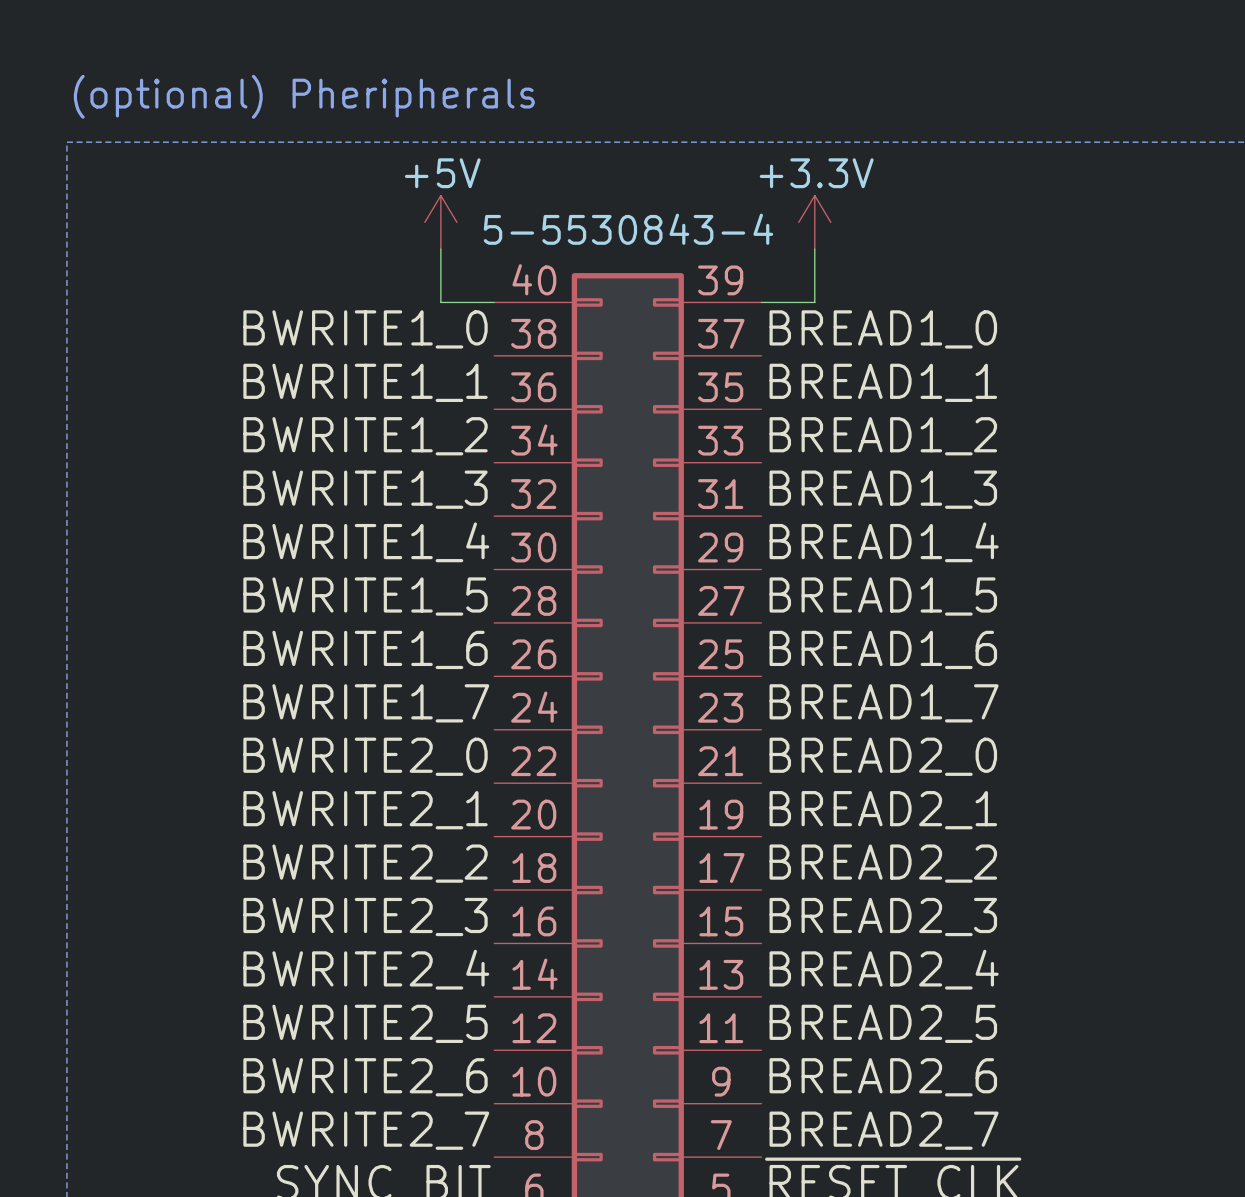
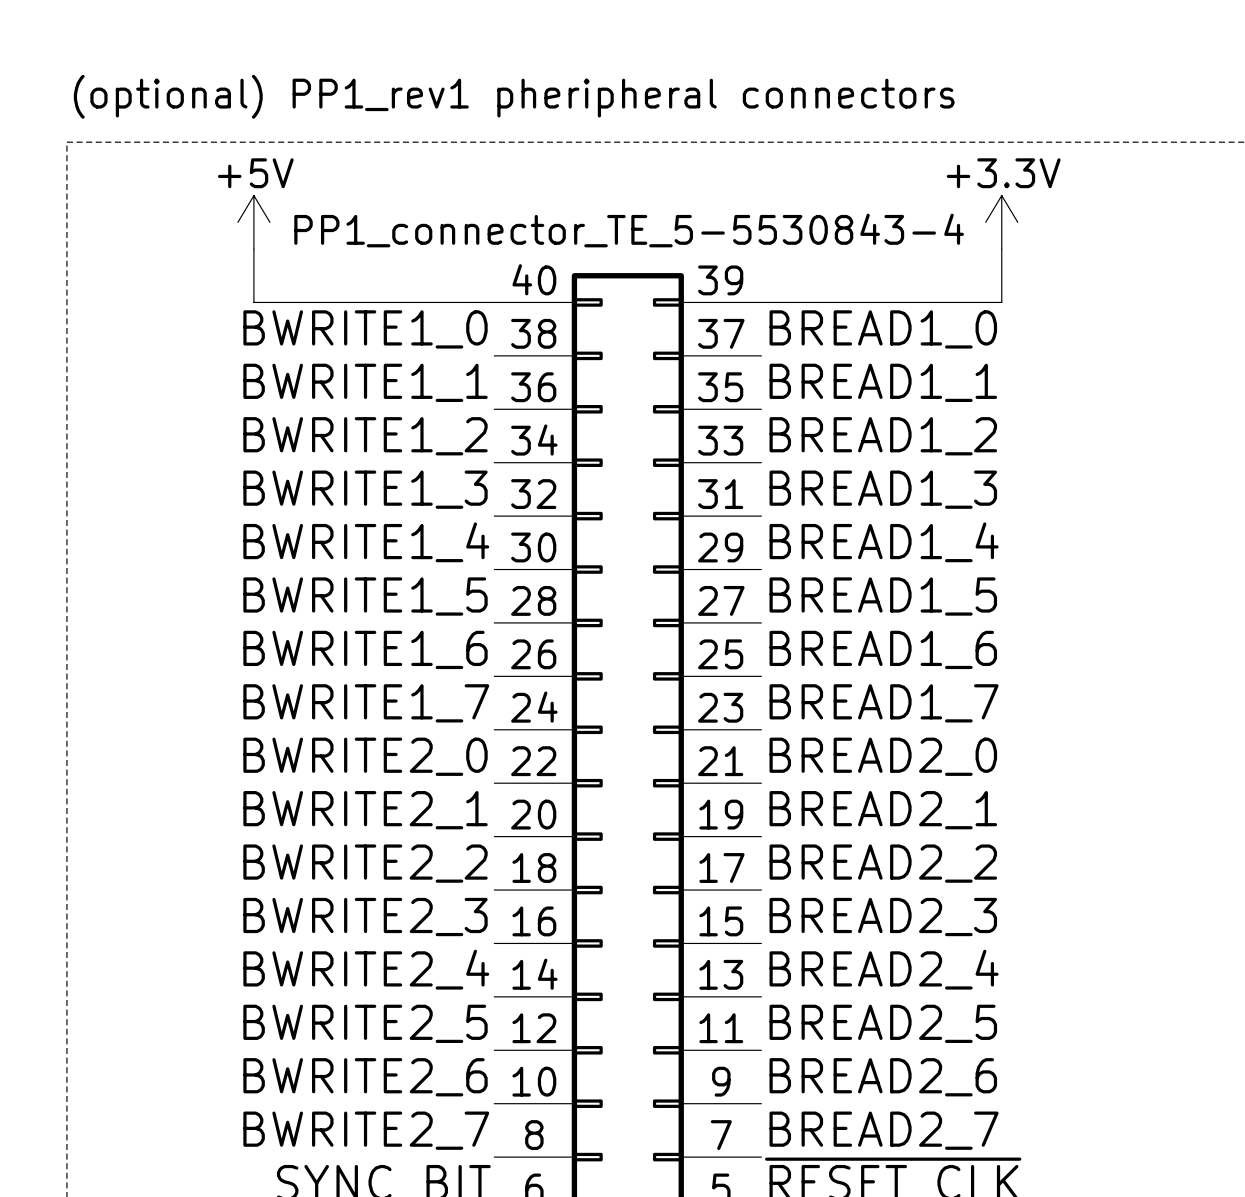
text: (optional) Pheripherals (304, 96) -> (optional) PP1_rev1 pheripheral connectors (514, 96)
power symbol position: +5V (440, 222) -> +5V (253, 222)
power symbol position: +3.3V (814, 222) -> +3.3V (1001, 222)
part value: 5-5530843-4 (628, 229) -> PP1_connector_TE_5-5530843-4 (629, 230)
wire: (440, 249) (440, 302) -> (253, 249) (253, 302) (440, 302)
wire: (814, 249) (814, 302) -> (1001, 249) (1001, 302) (814, 302)

